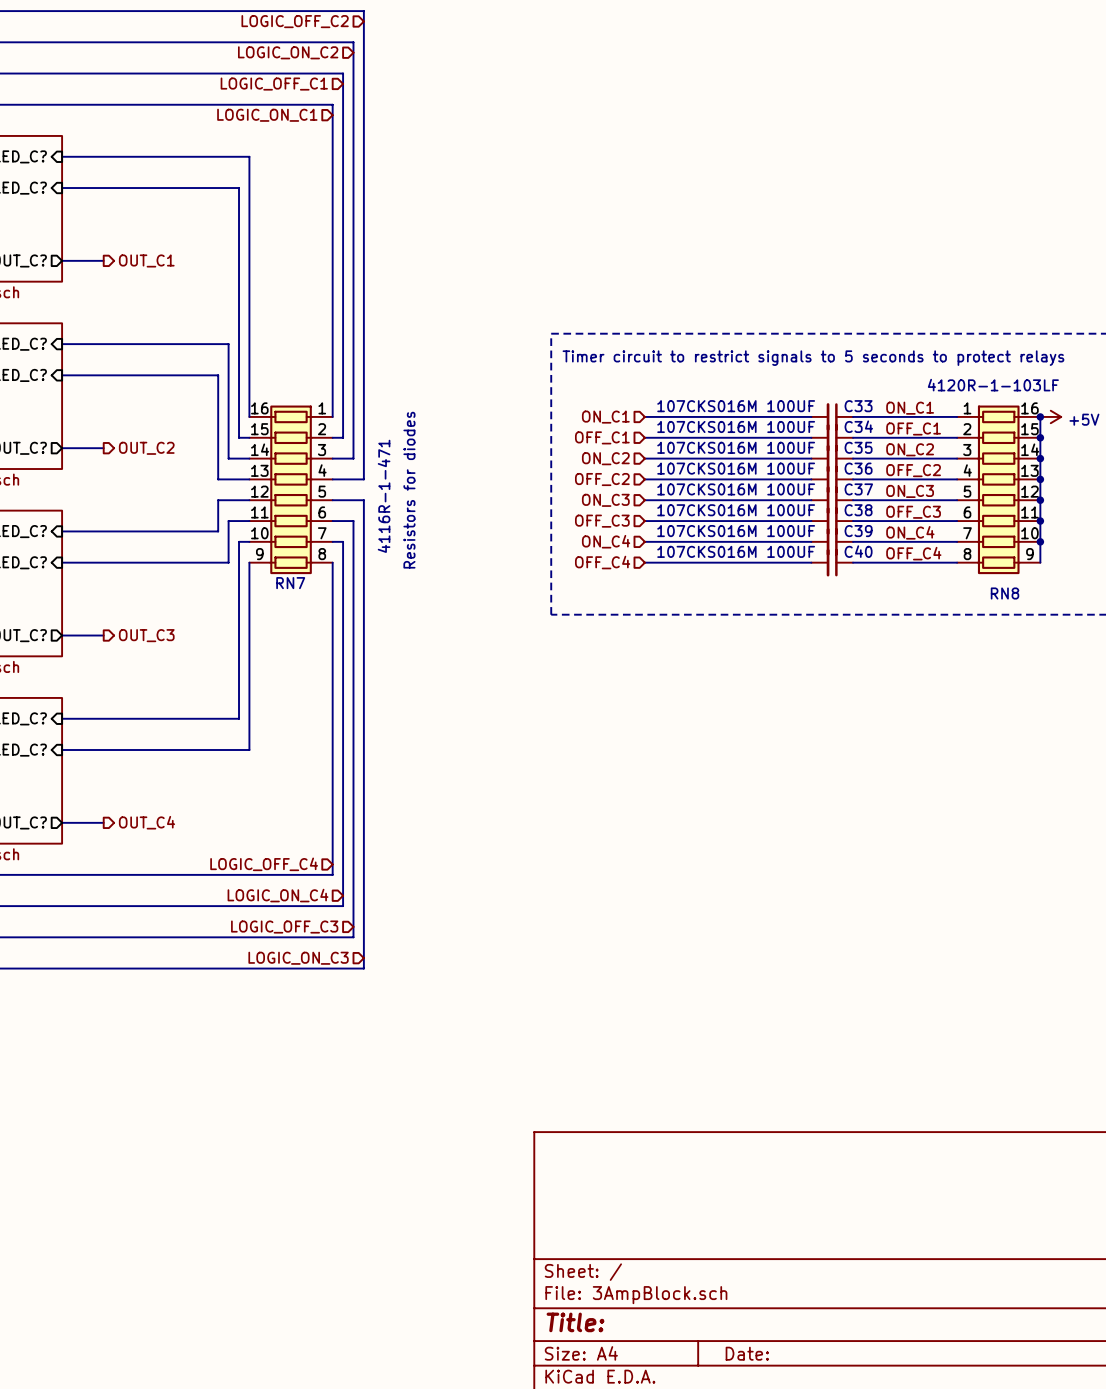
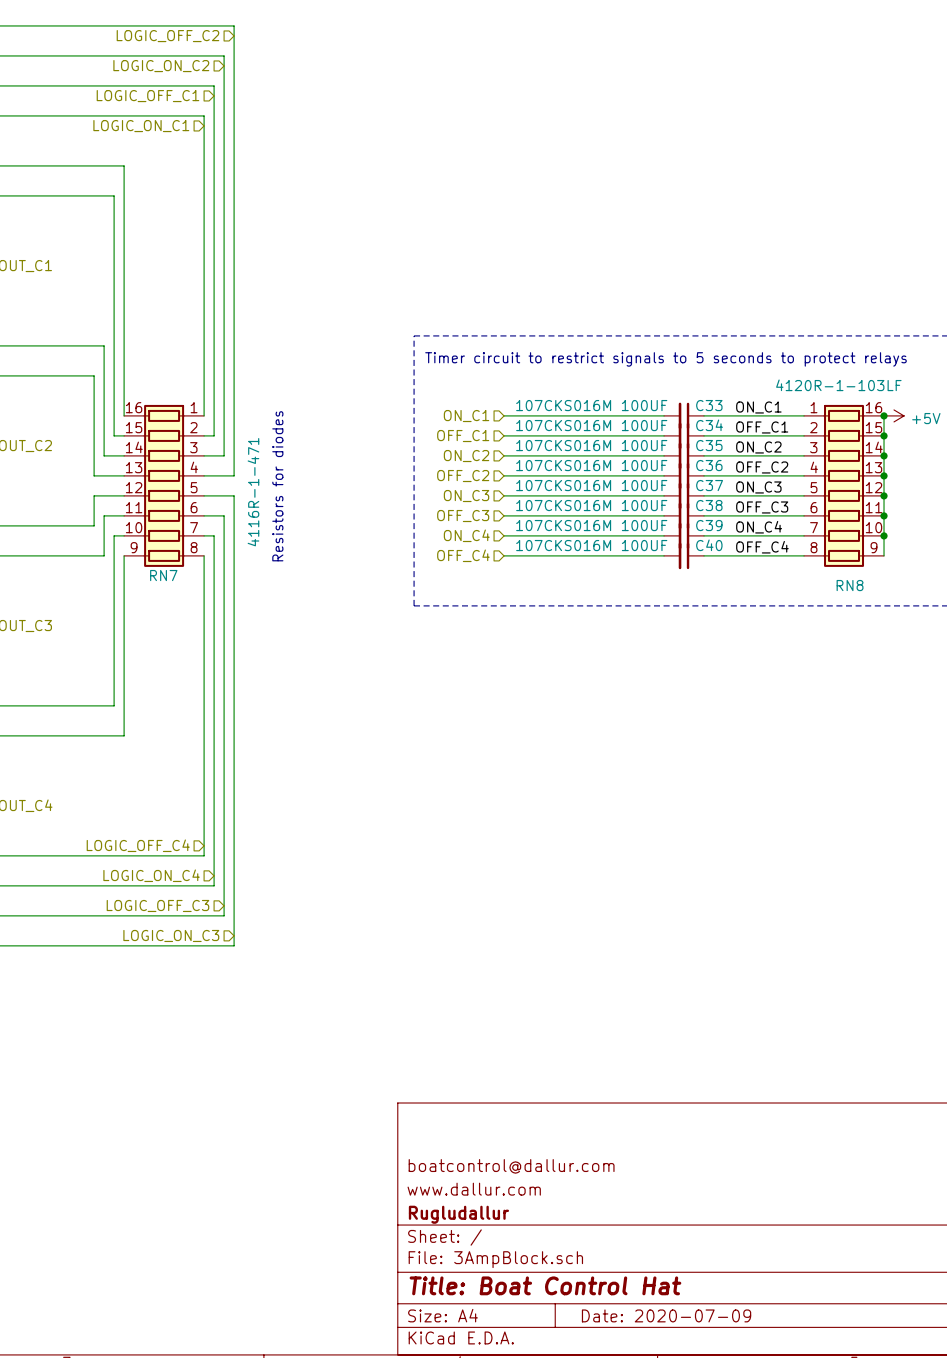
title block: none -> boatcontrol@dallur.com (511, 1166)
title block: none -> www.dallur.com (474, 1189)
title block: none -> Rugludallur (458, 1214)
title block: Title: (575, 1322) -> Title: Boat Control Hat (545, 1285)
title block: Date: (747, 1353) -> Date: 2020-07-09 (666, 1315)

